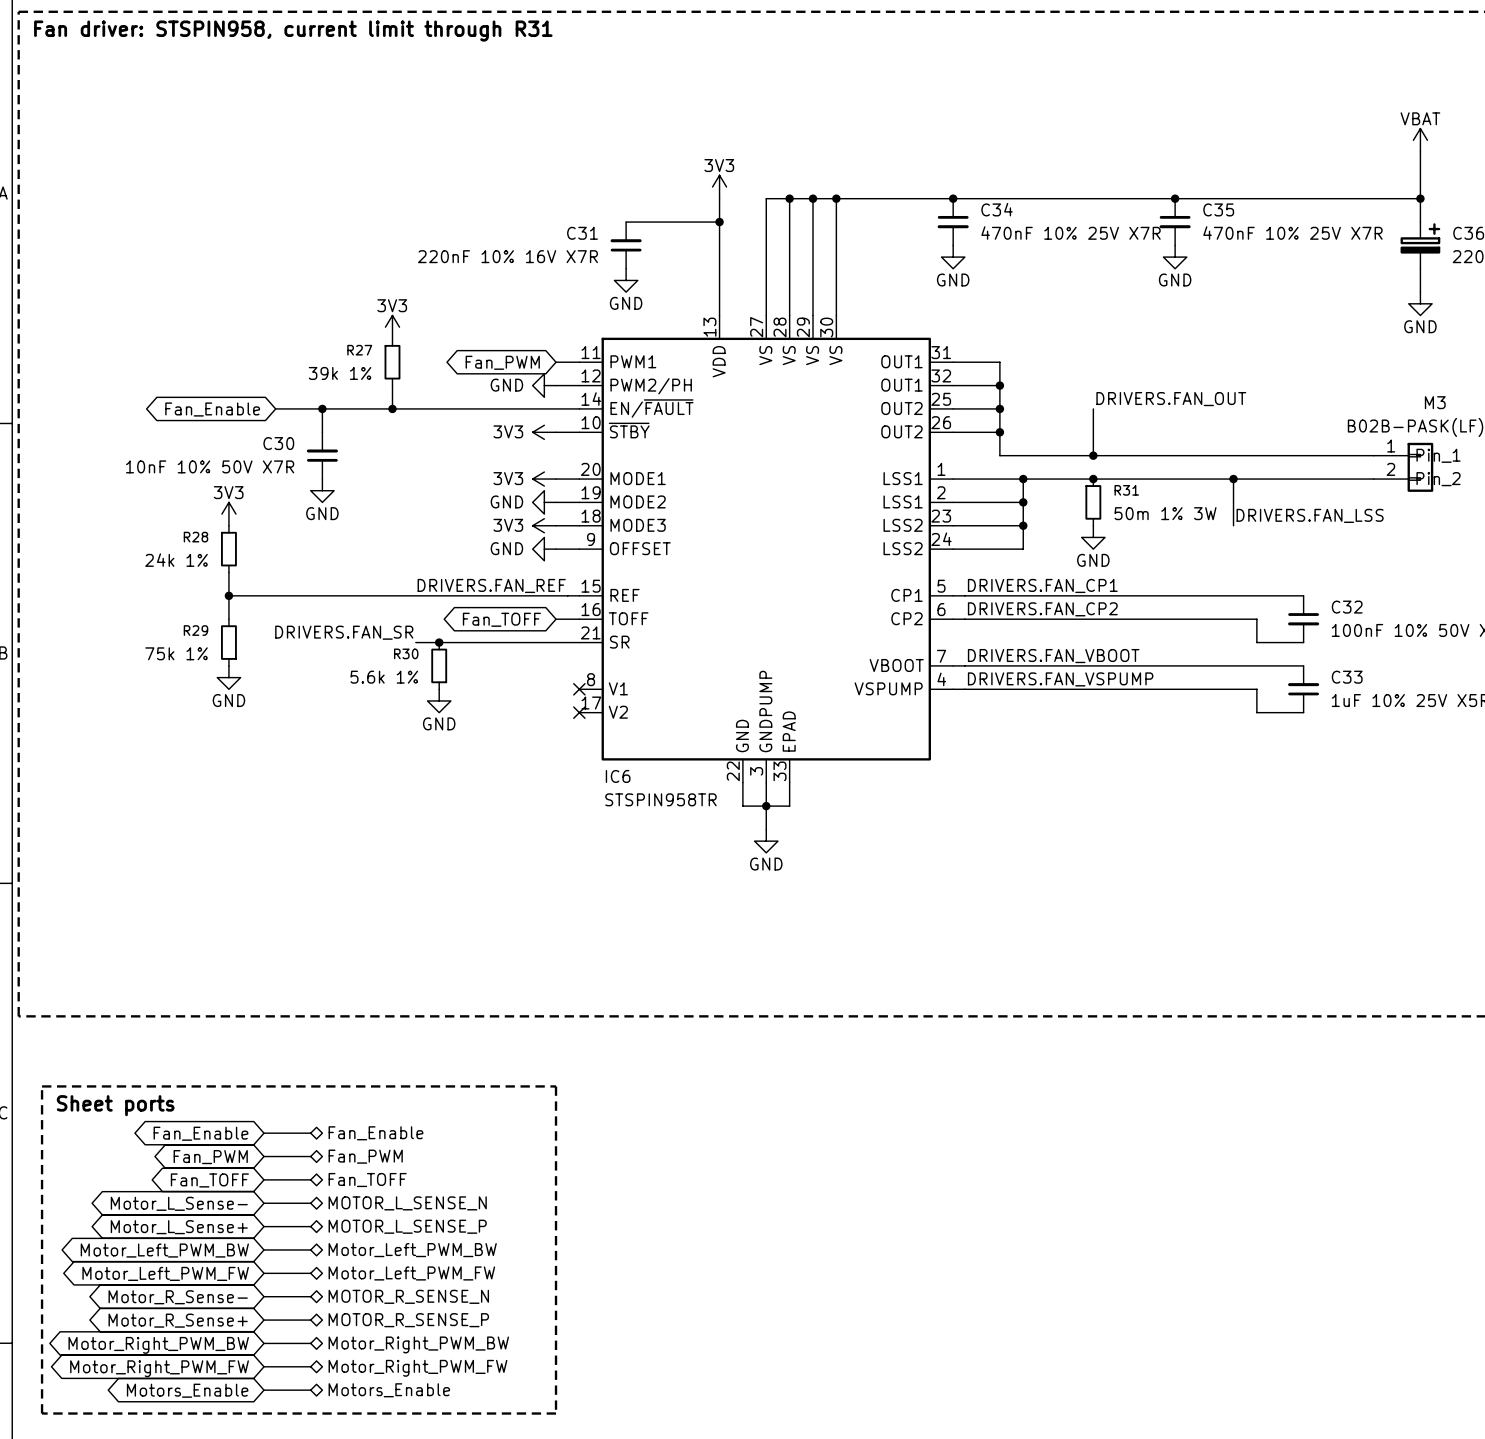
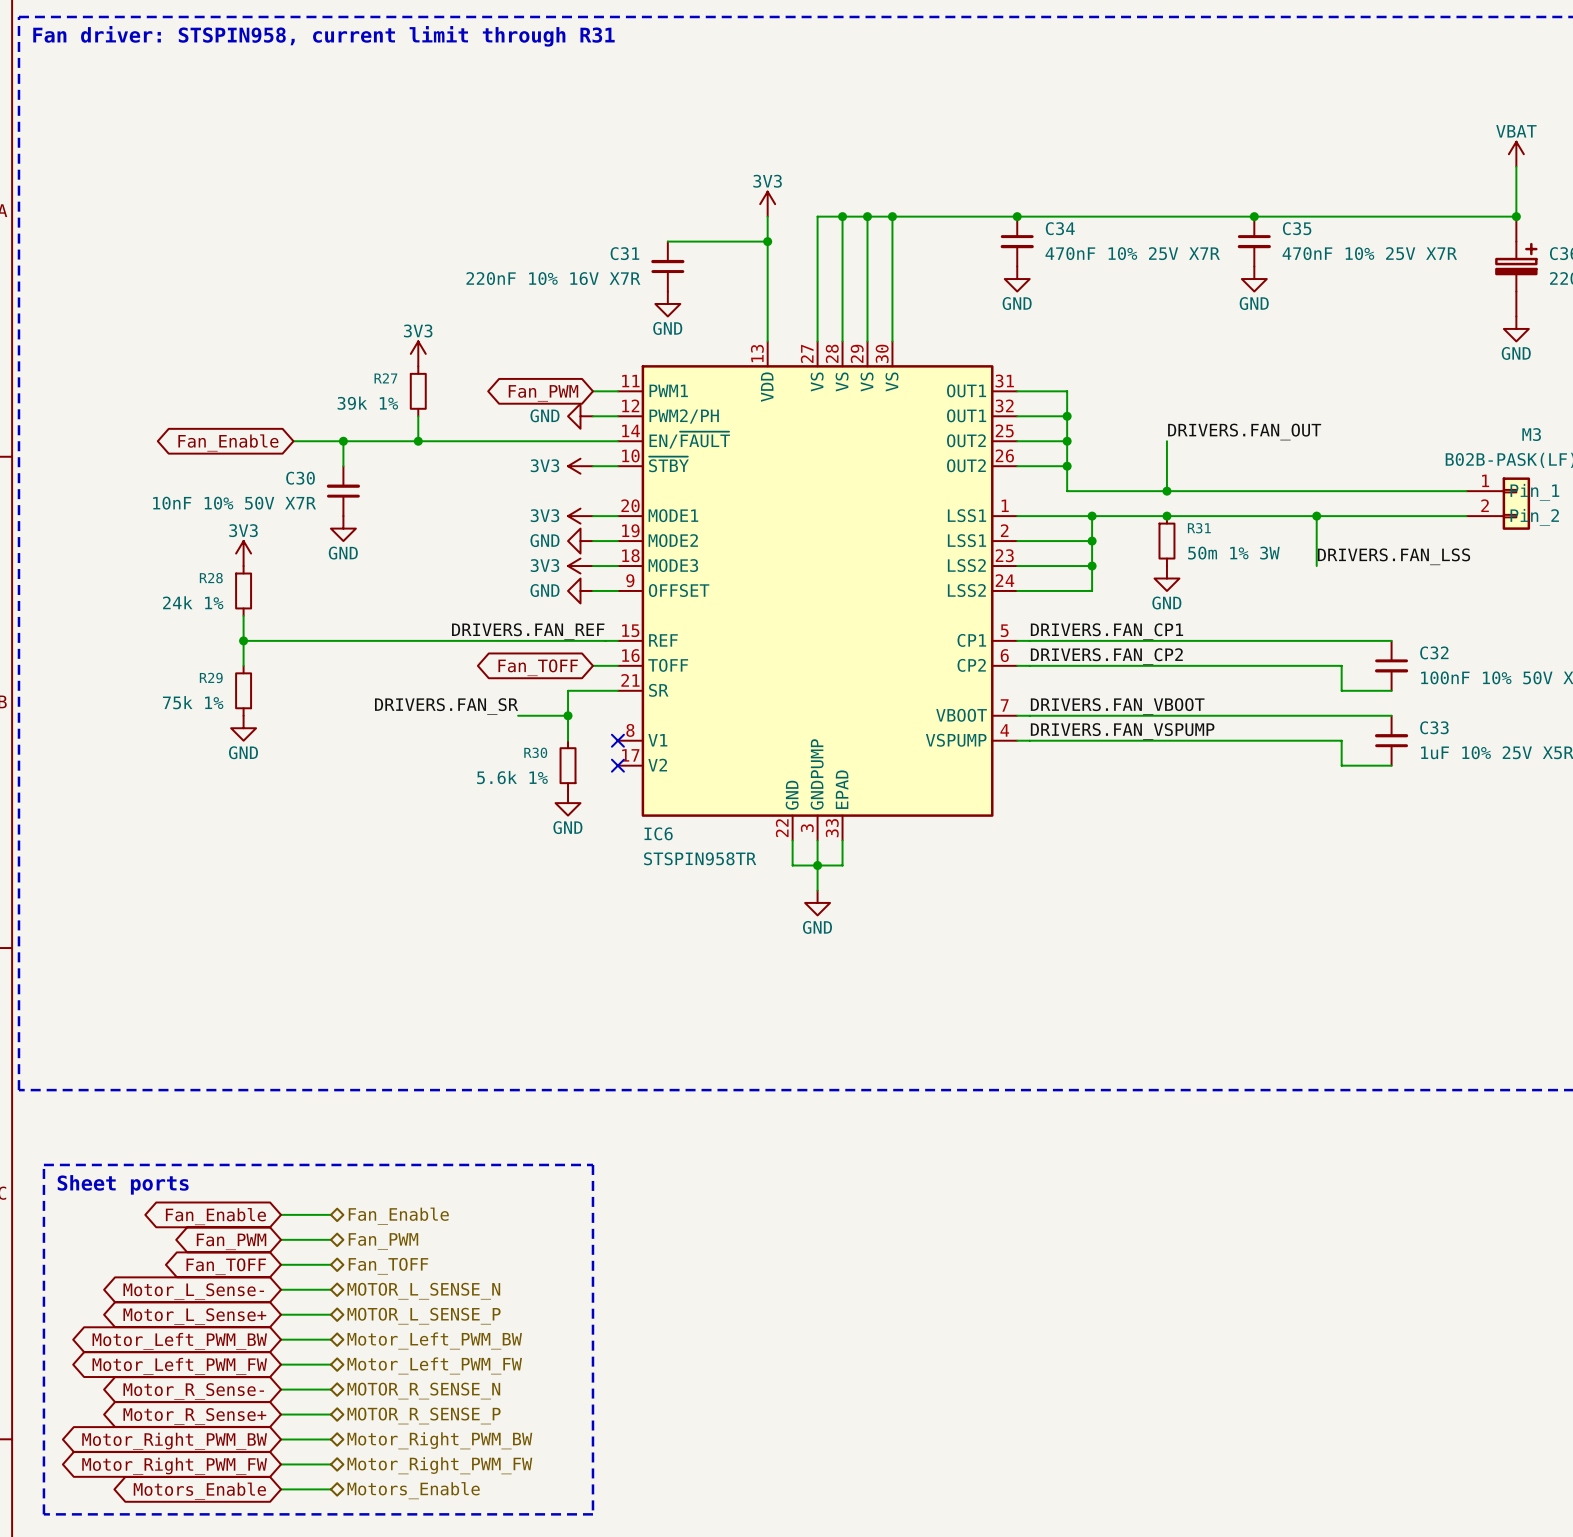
label position: DRIVERS.FAN_SR (344, 632) -> DRIVERS.FAN_SR (446, 706)
wire: (415, 642) (532, 642) -> (568, 740) (568, 690)
junction: (439, 642) -> none
R30 position: (439, 665) -> (568, 765)
wire: none -> (518, 715) (568, 715)
junction: none -> (568, 715)
power symbol position: GND (439, 700) -> GND (568, 803)

